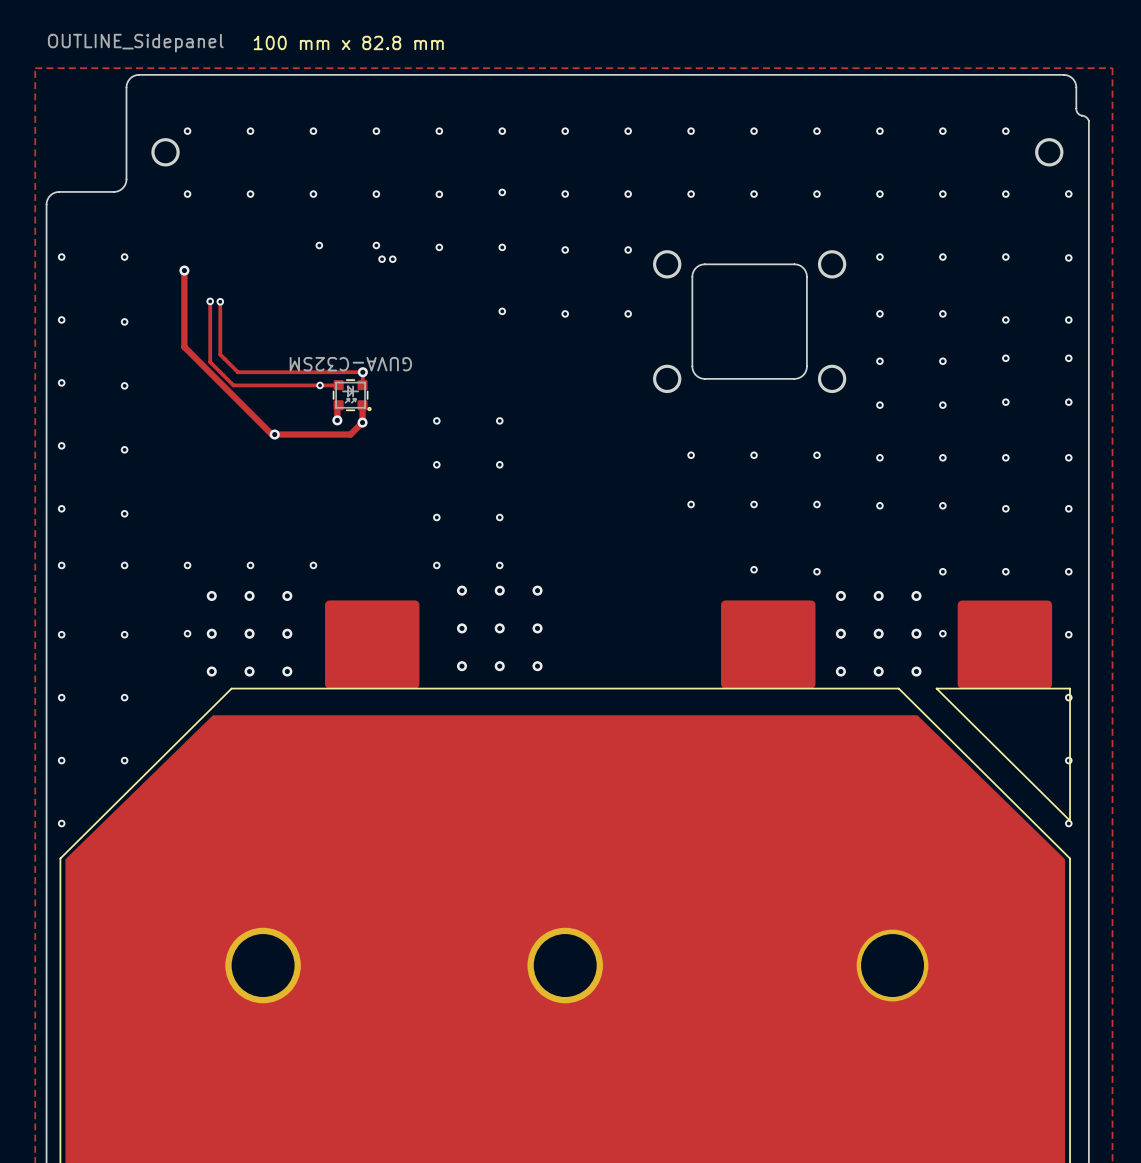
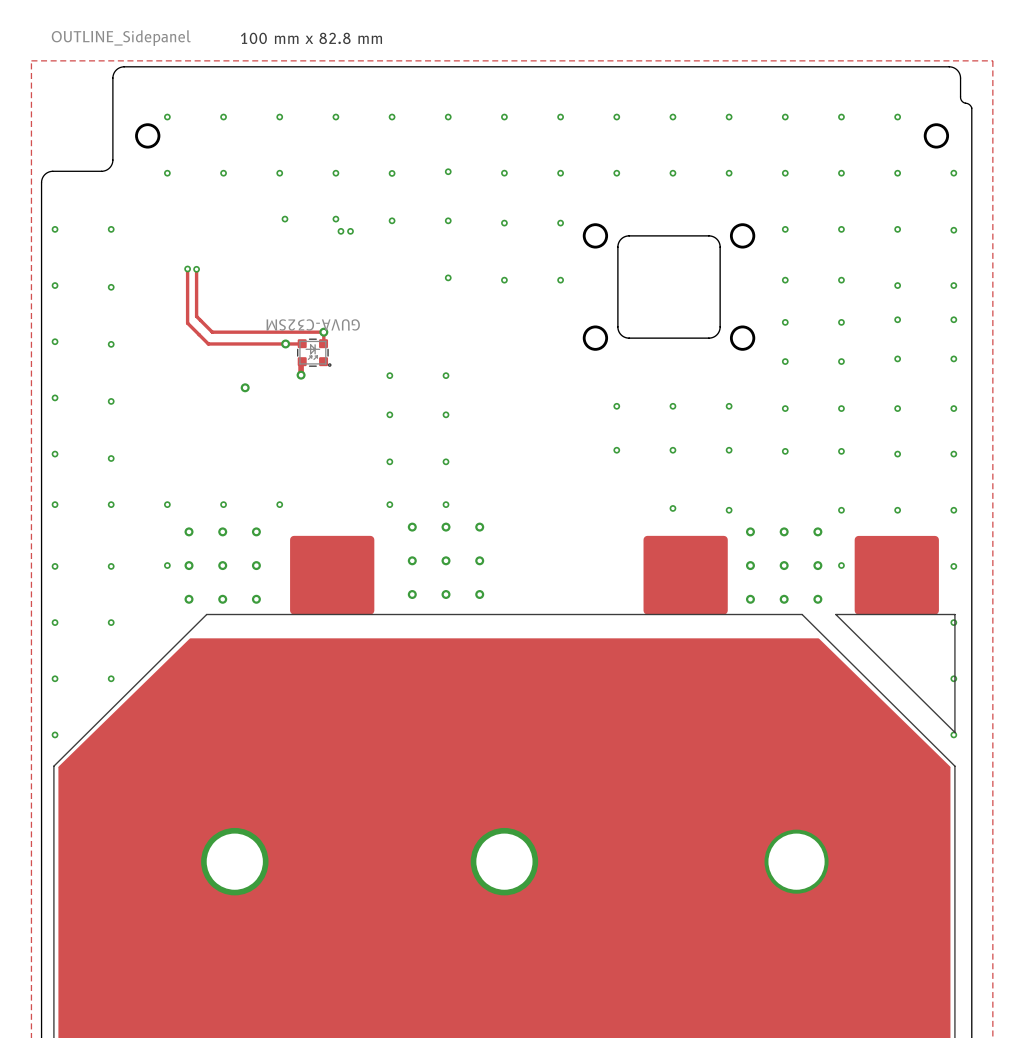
track: (184, 270) (184, 347) (271, 434) (350, 434) (362, 422) (362, 405) -> none
via: (184, 270) -> none
via: (320, 385) -> none
via position: (362, 422) -> (285, 343)

